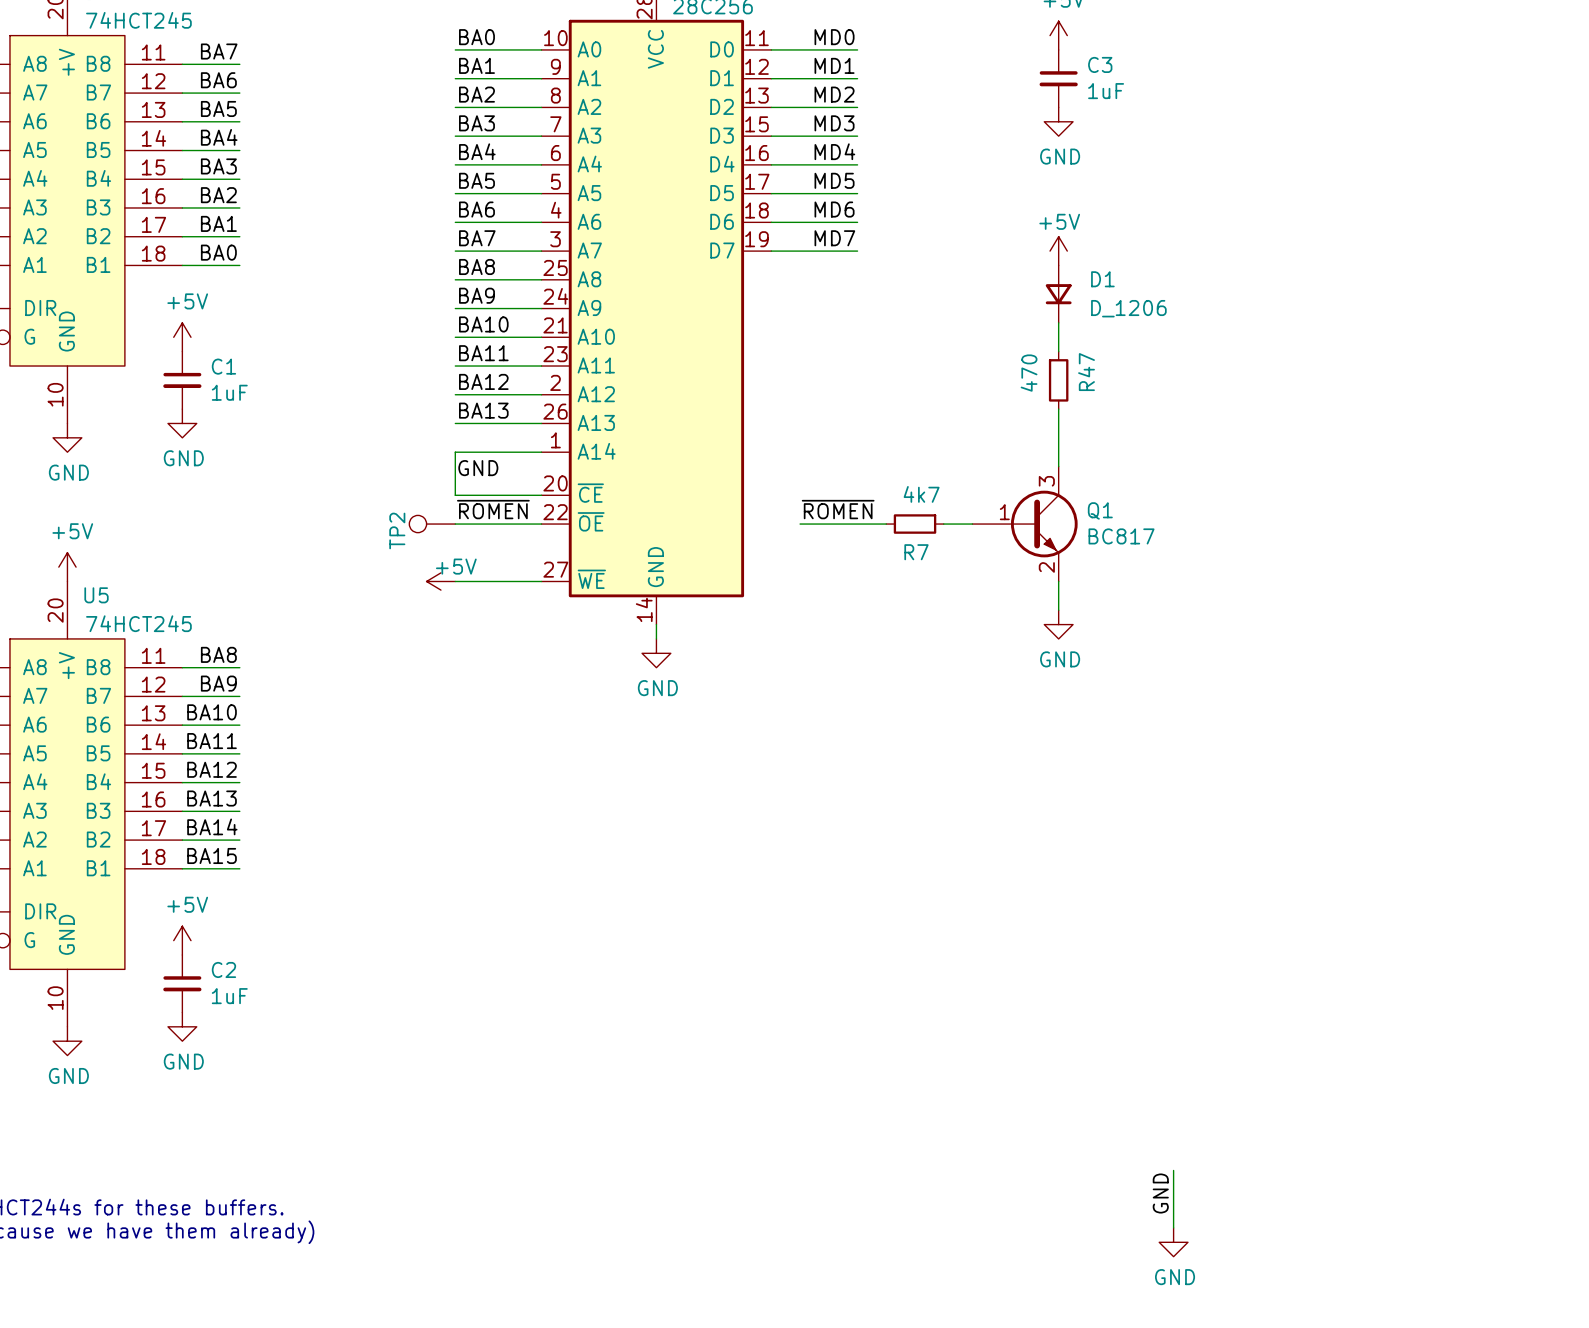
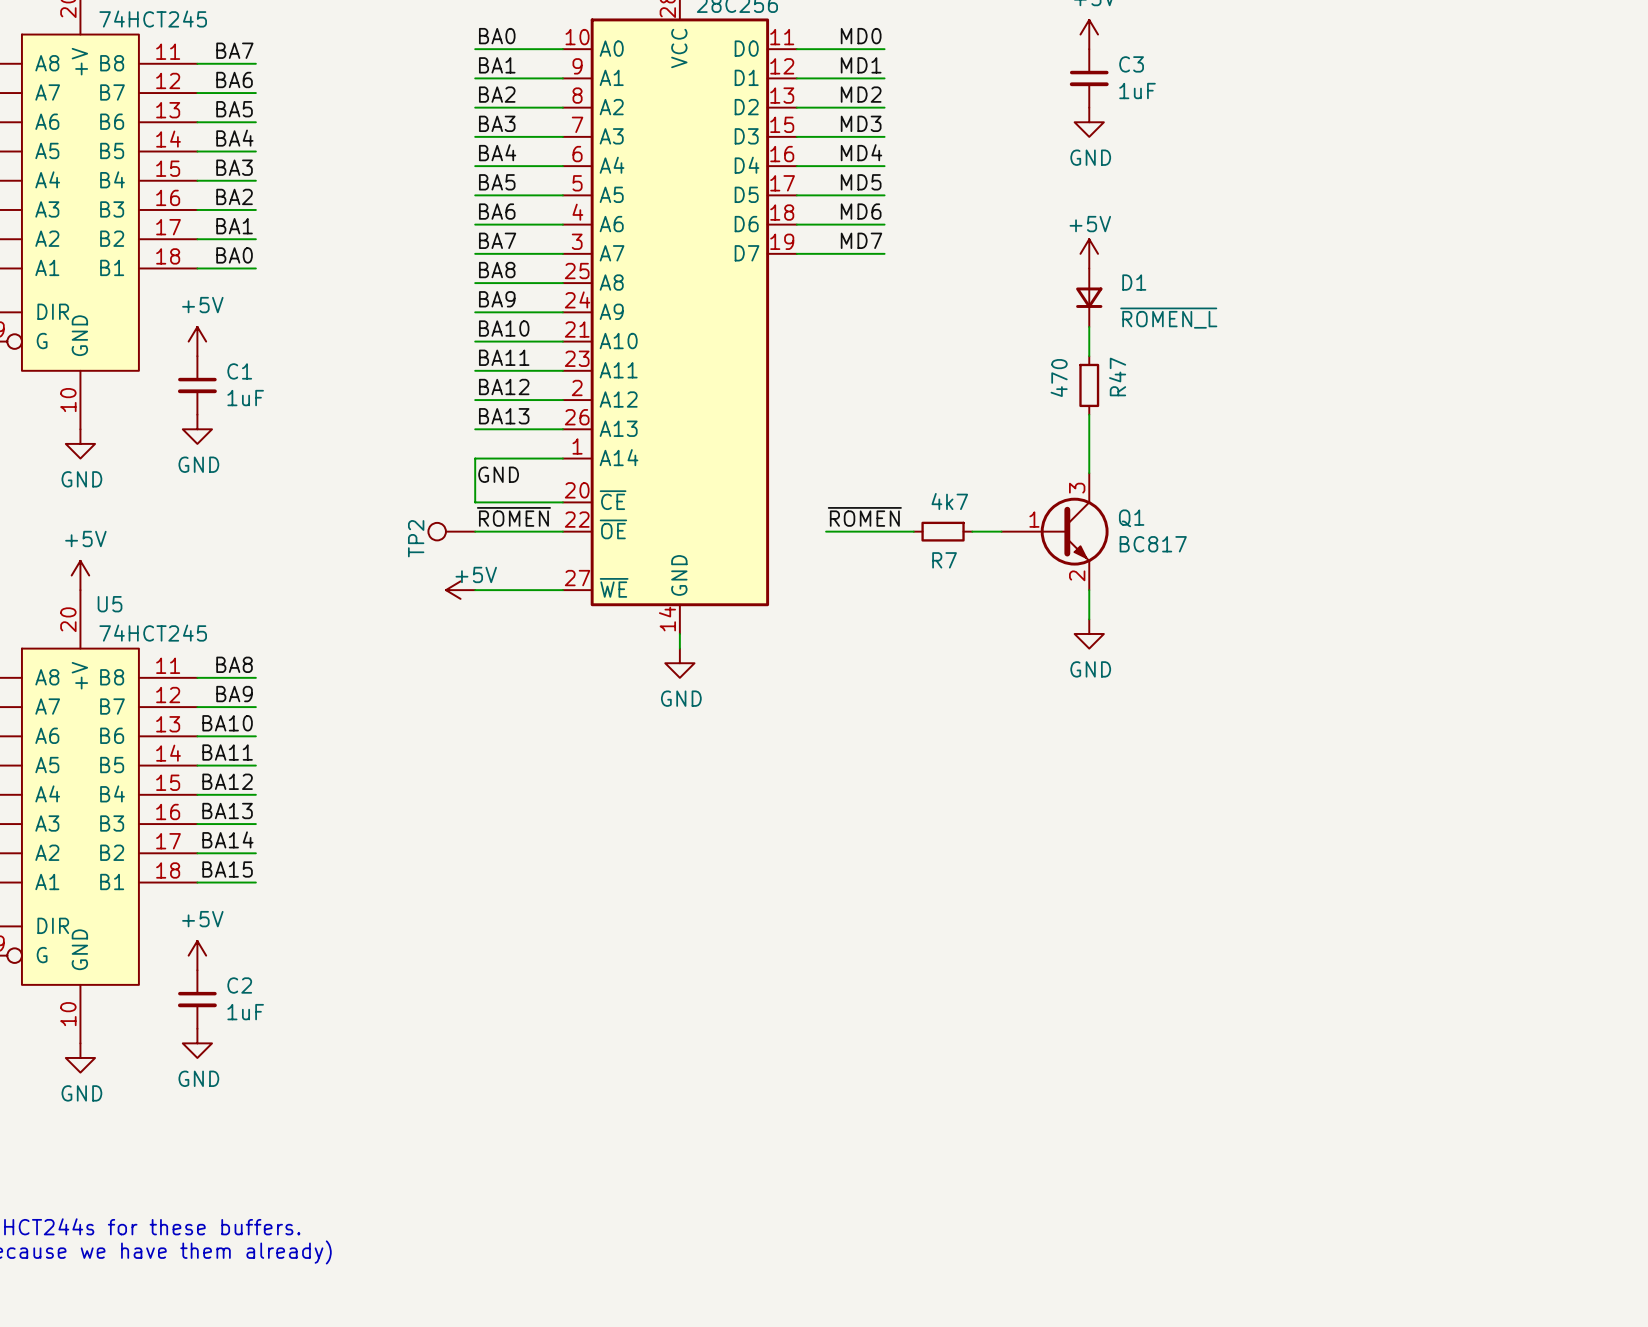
D1 value: D_1206 (1128, 308) -> ~{ROMEN_L} (1168, 318)
wire: (1173, 1170) (1173, 1227) -> none
label: GND (1160, 1193) -> none
power symbol: GND (1173, 1242) -> none

